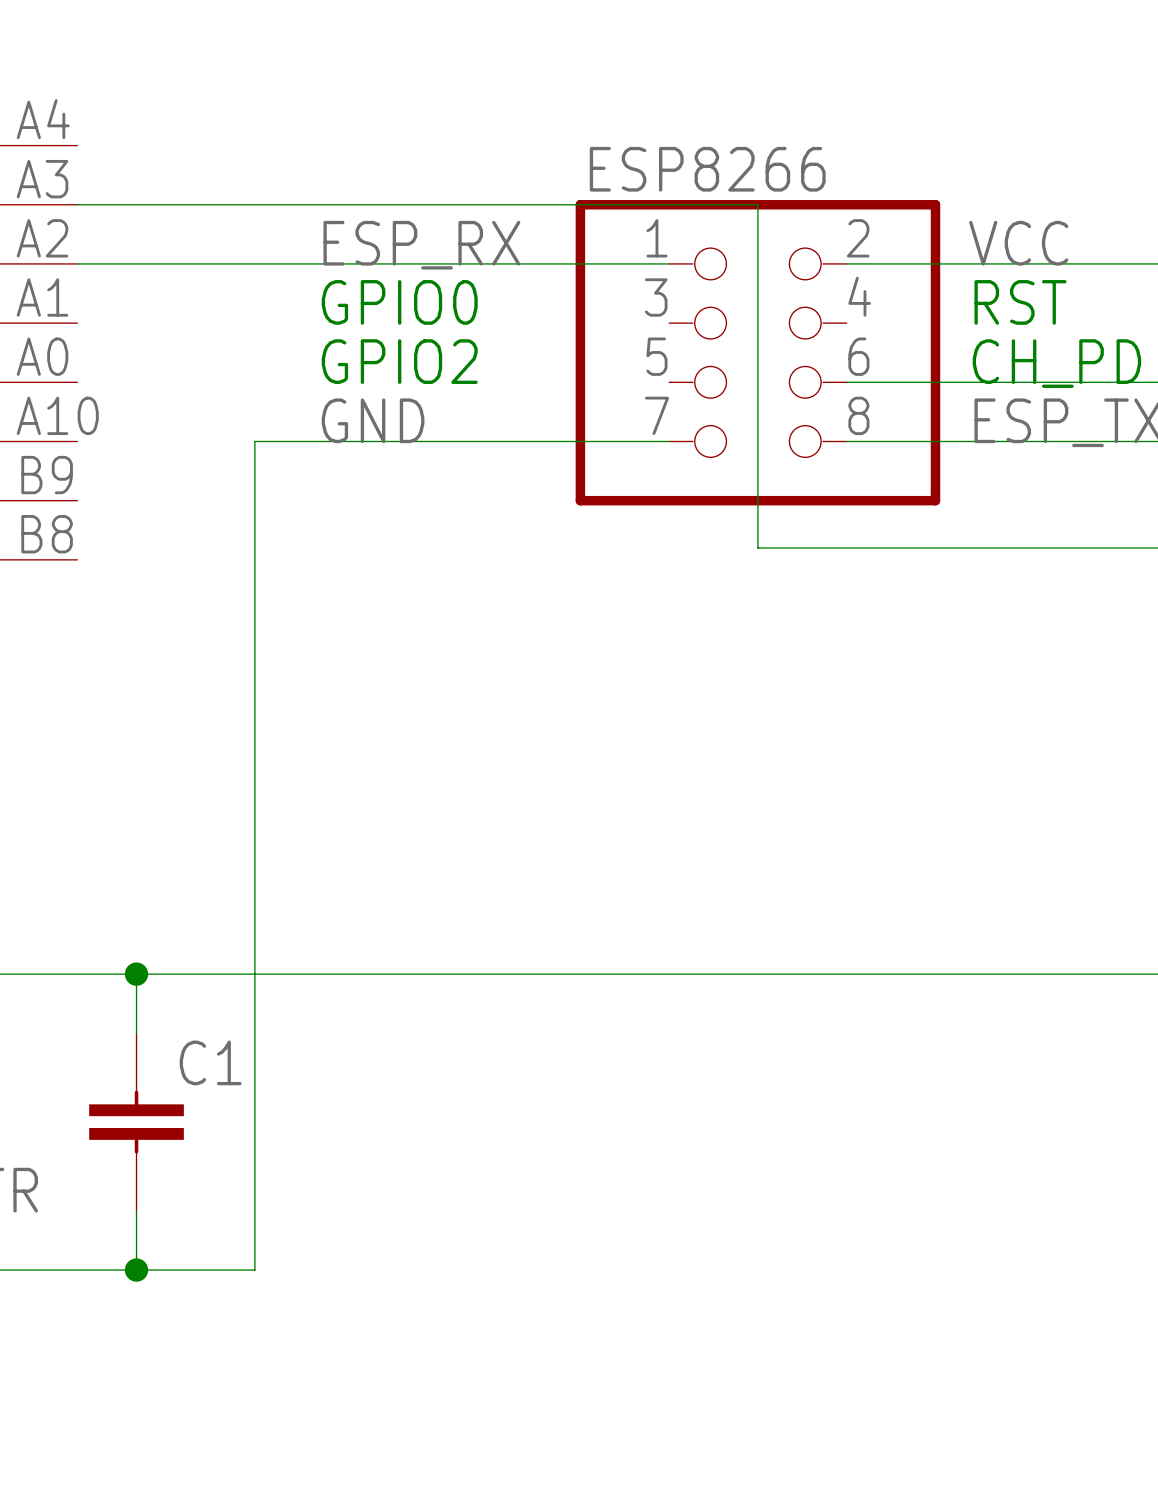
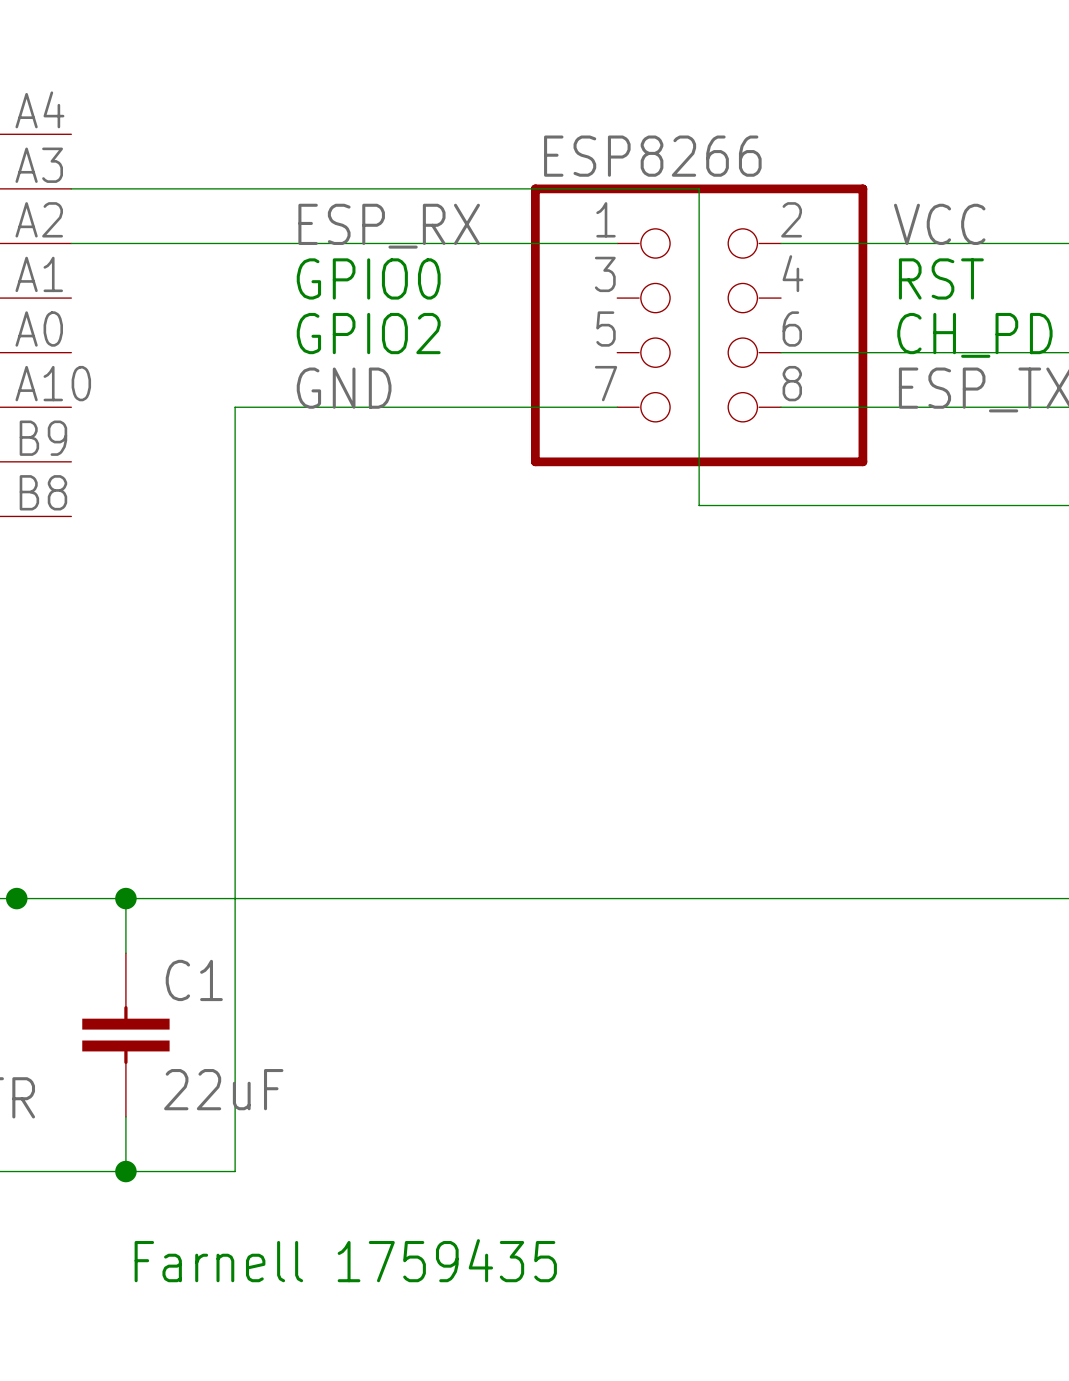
junction: none -> (16, 898)
C1 value: none -> 22uF (223, 1089)
text: none -> Farnell 1759435 (345, 1260)

